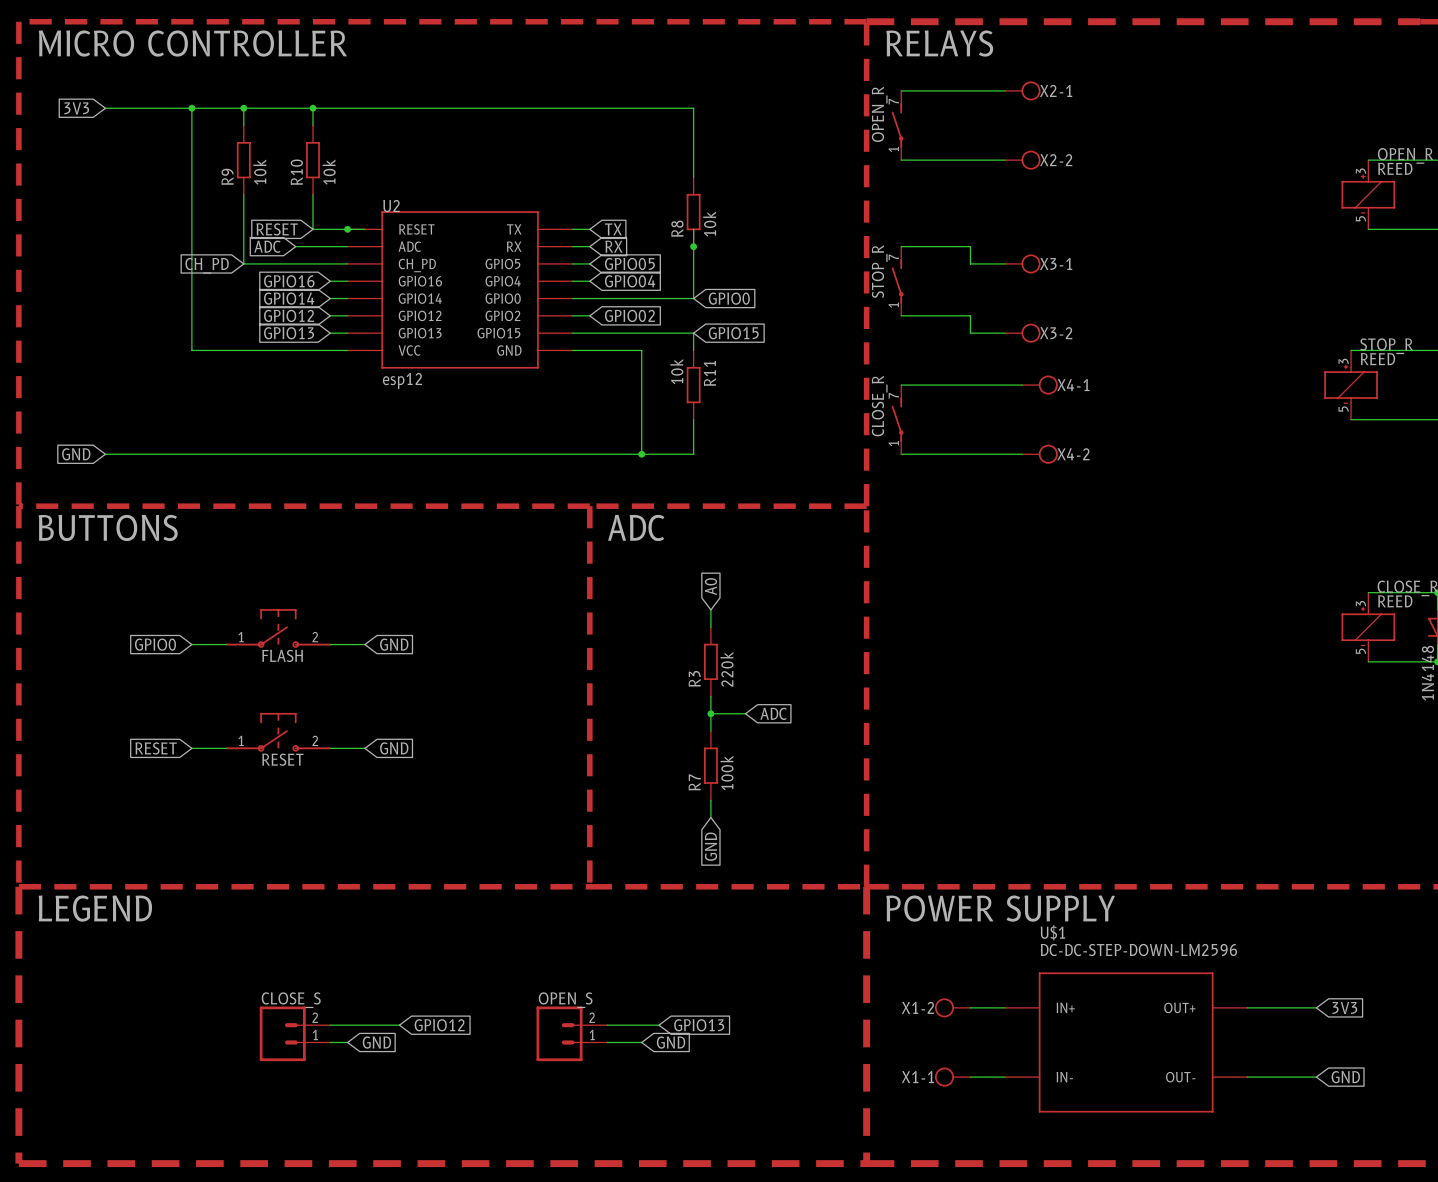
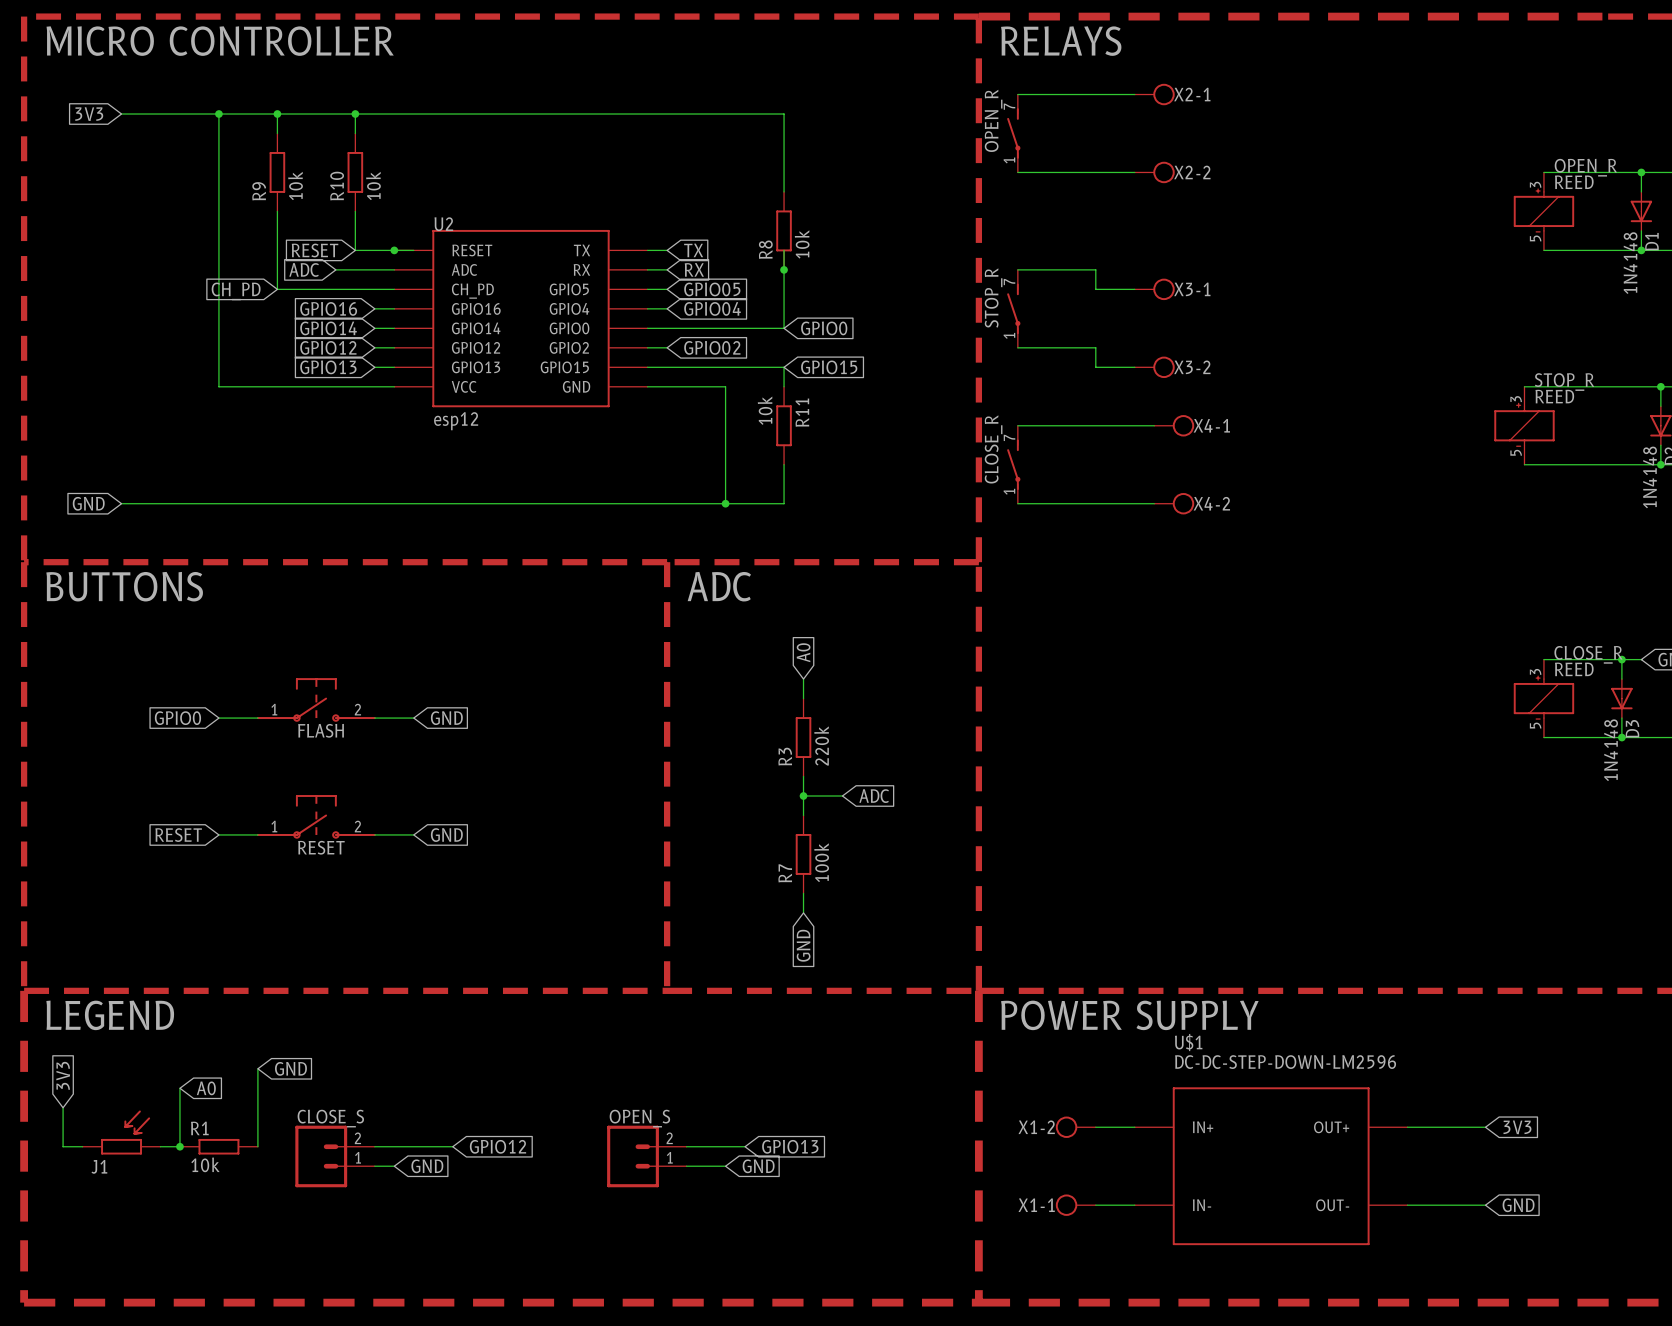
wire: none -> (257, 1068) (257, 1146)
global label: none -> GND (290, 1068)
global label: none -> 3V3 (63, 1075)
wire: none -> (179, 1088) (179, 1146) (160, 1146)
global label: none -> A0 (206, 1088)
wire: none -> (63, 1107) (63, 1146) (82, 1146)
J1: none -> (121, 1132)
junction: none -> (179, 1146)
R1: none -> 10k (218, 1146)

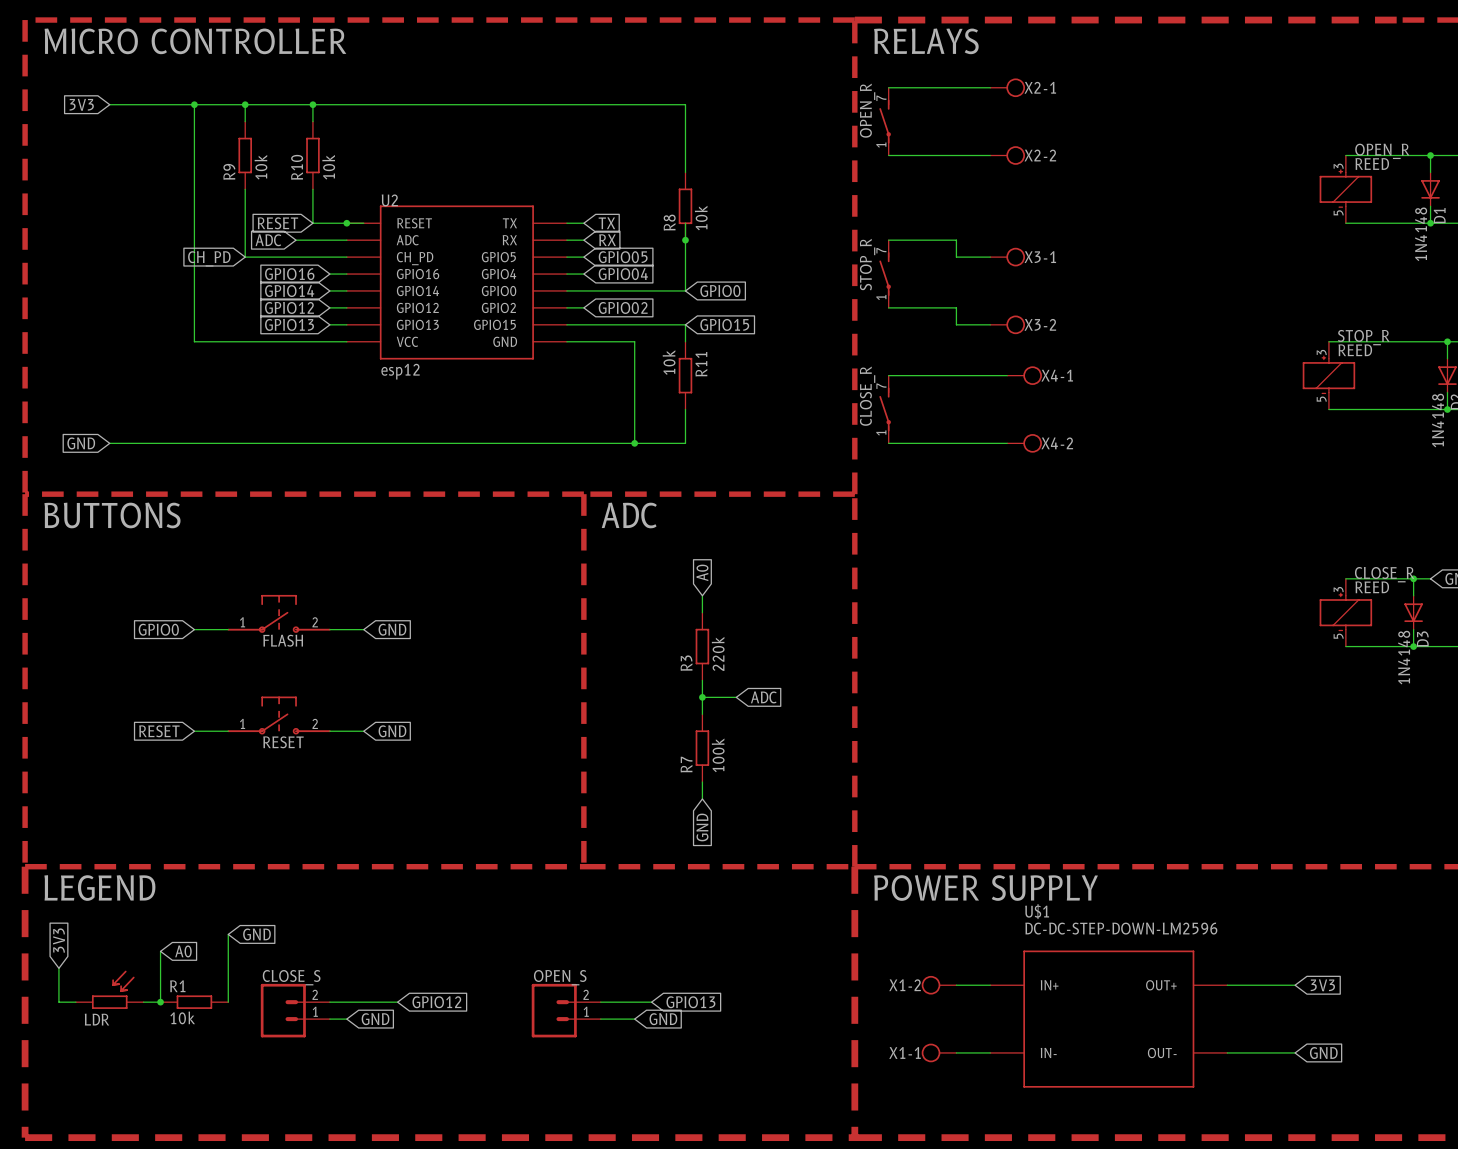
J1 name: J1 (99, 1166) -> LDR (96, 1019)

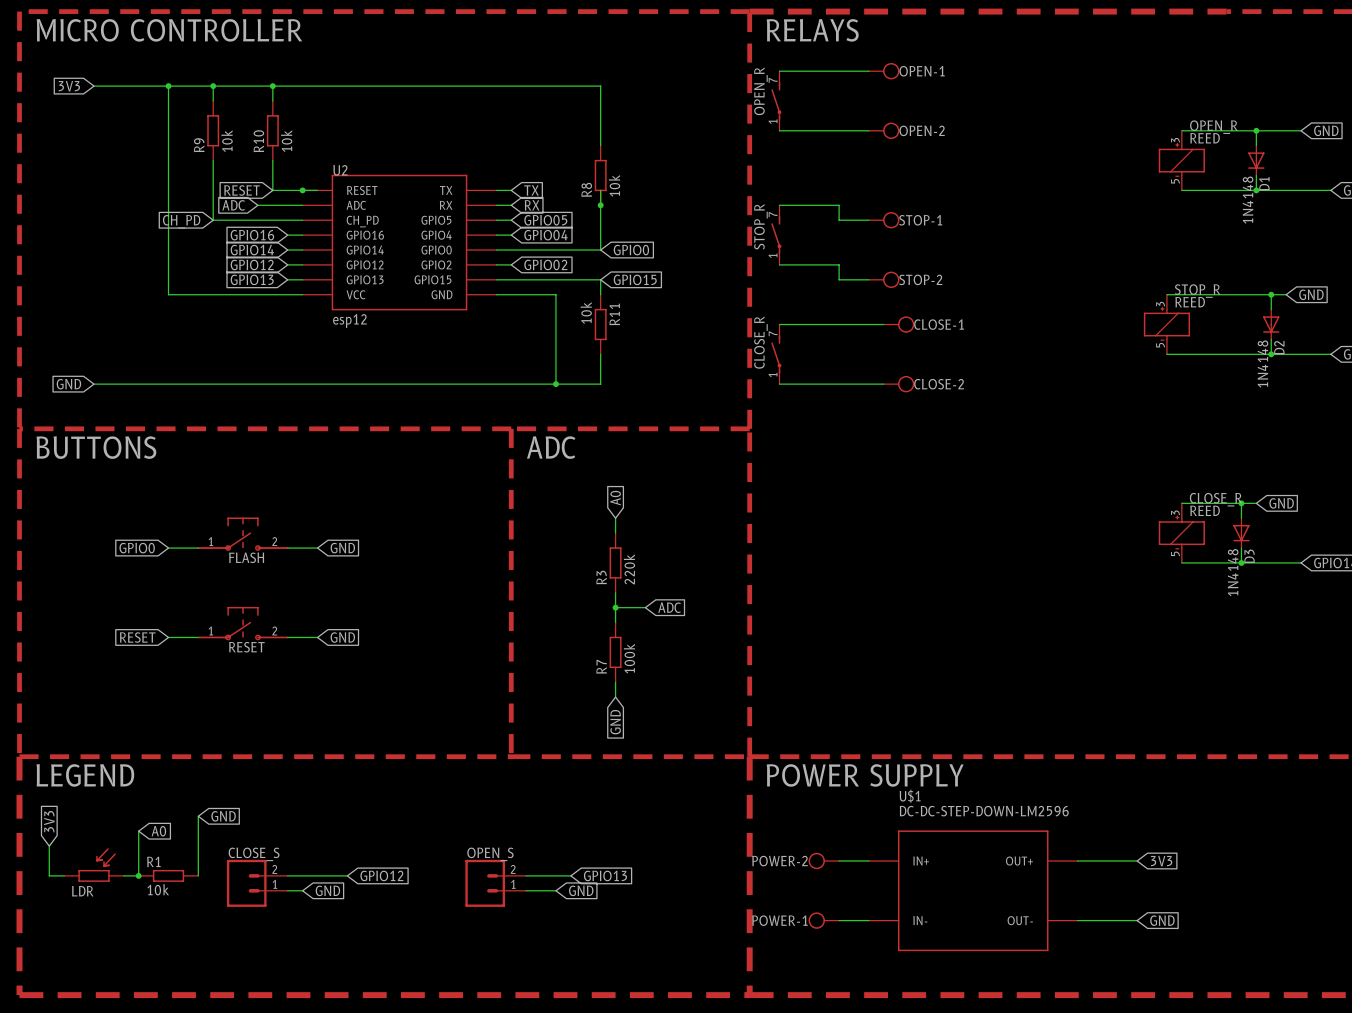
X2-1 name: X2-1 (1040, 87) -> OPEN-1 (922, 71)
X2-2 name: X2-2 (1040, 155) -> OPEN-2 (922, 130)
X3-1 name: X3-1 (1040, 257) -> STOP-1 (920, 220)
X3-2 name: X3-2 (1040, 324) -> STOP-2 (920, 279)
X4-1 name: X4-1 (1057, 375) -> CLOSE-1 (939, 324)
X4-2 name: X4-2 (1057, 443) -> CLOSE-2 (939, 384)
X1-2 name: X1-2 (905, 985) -> POWER-2 (779, 861)
X1-1 name: X1-1 (905, 1052) -> POWER-1 (779, 920)

